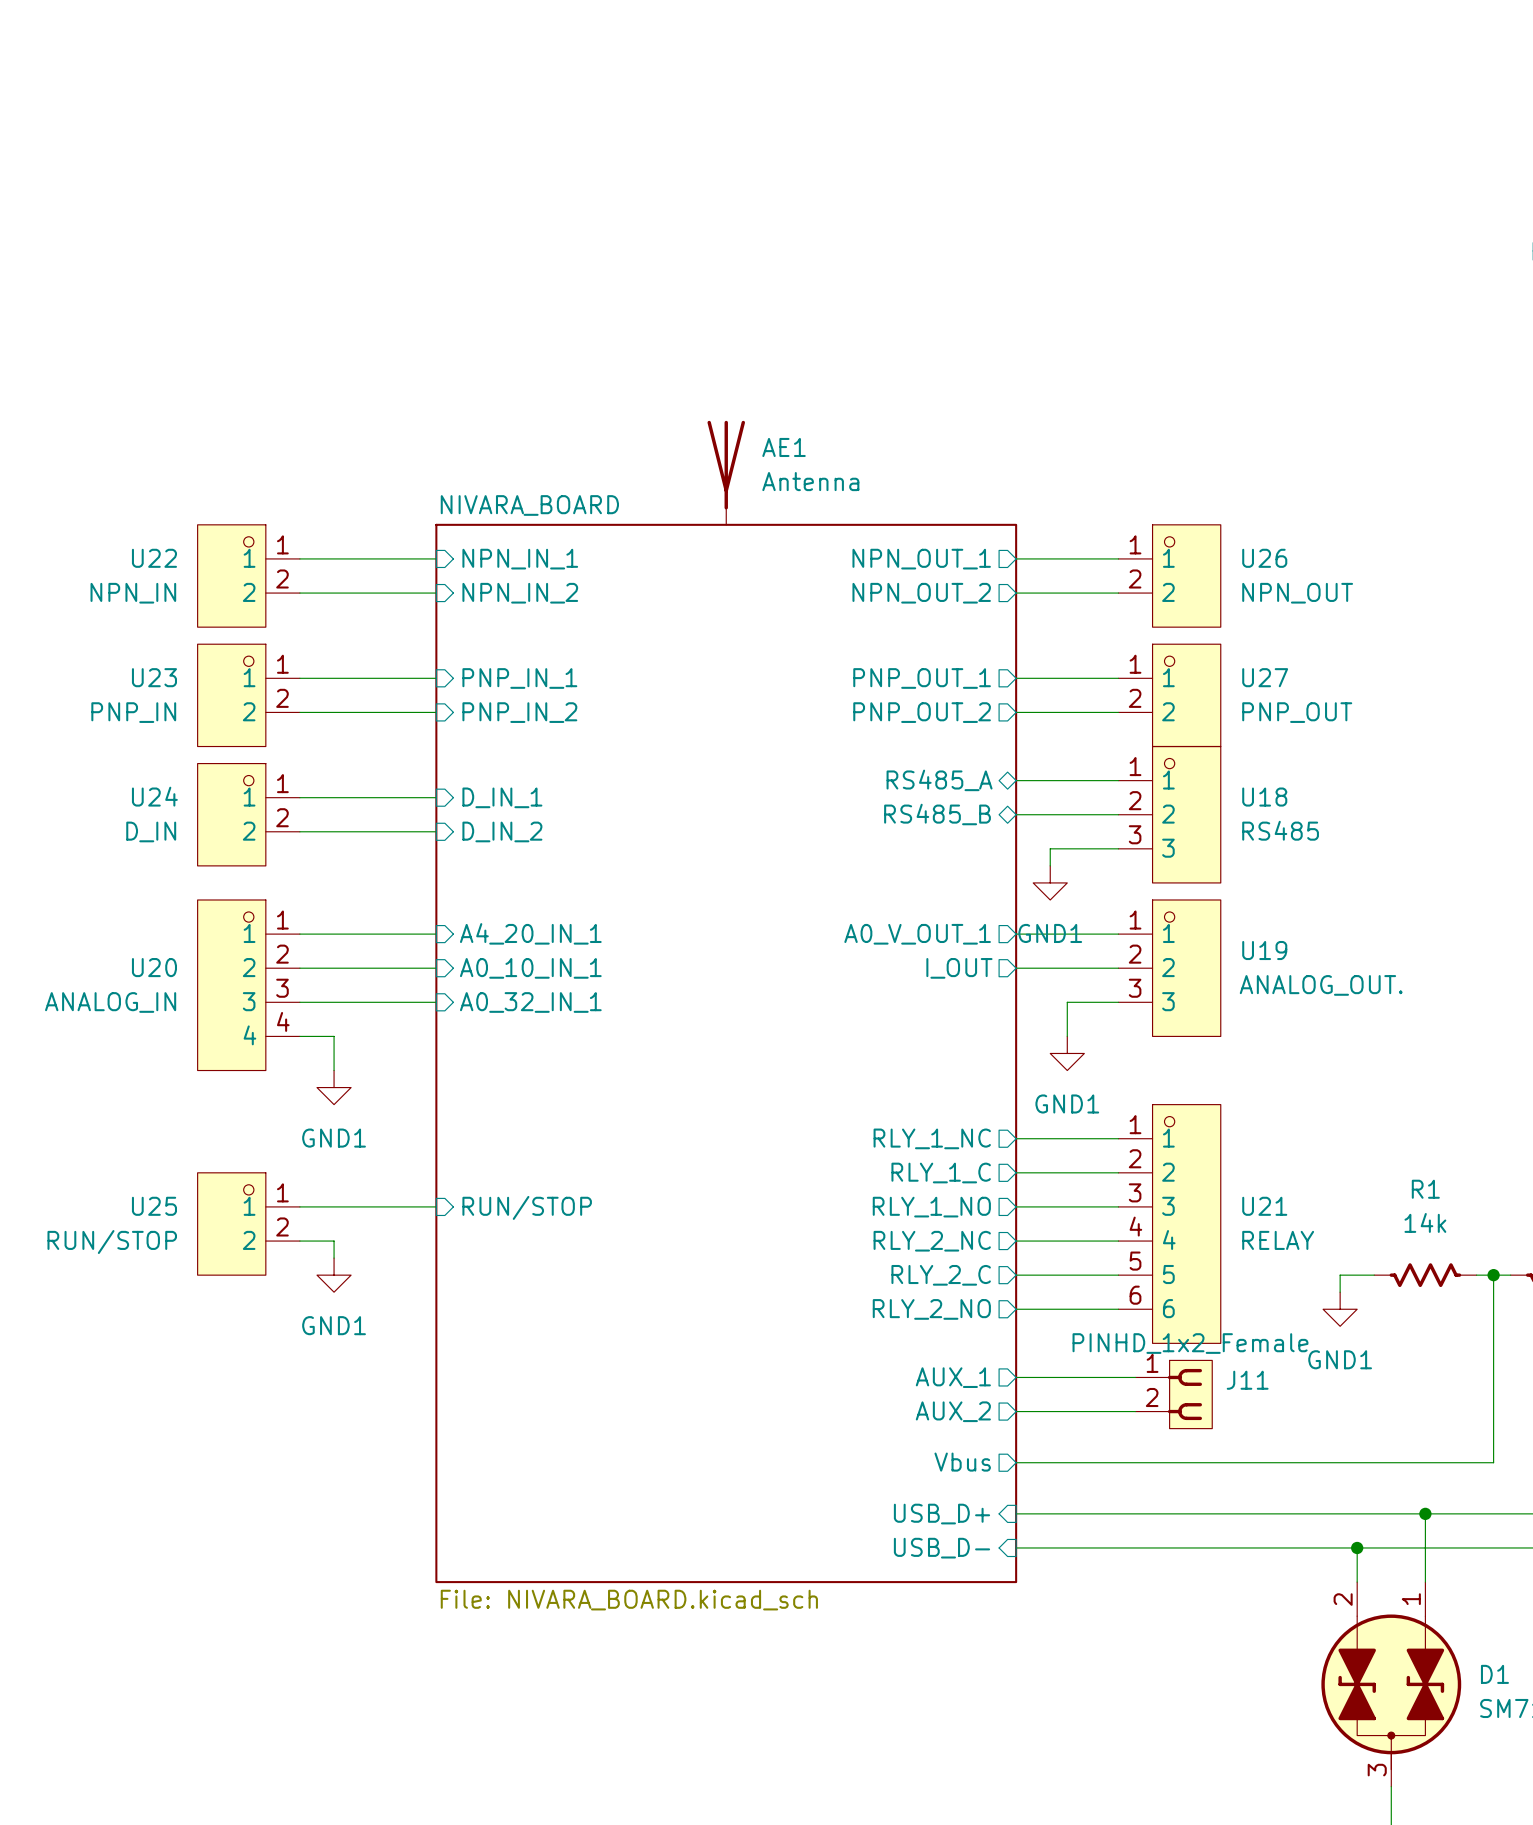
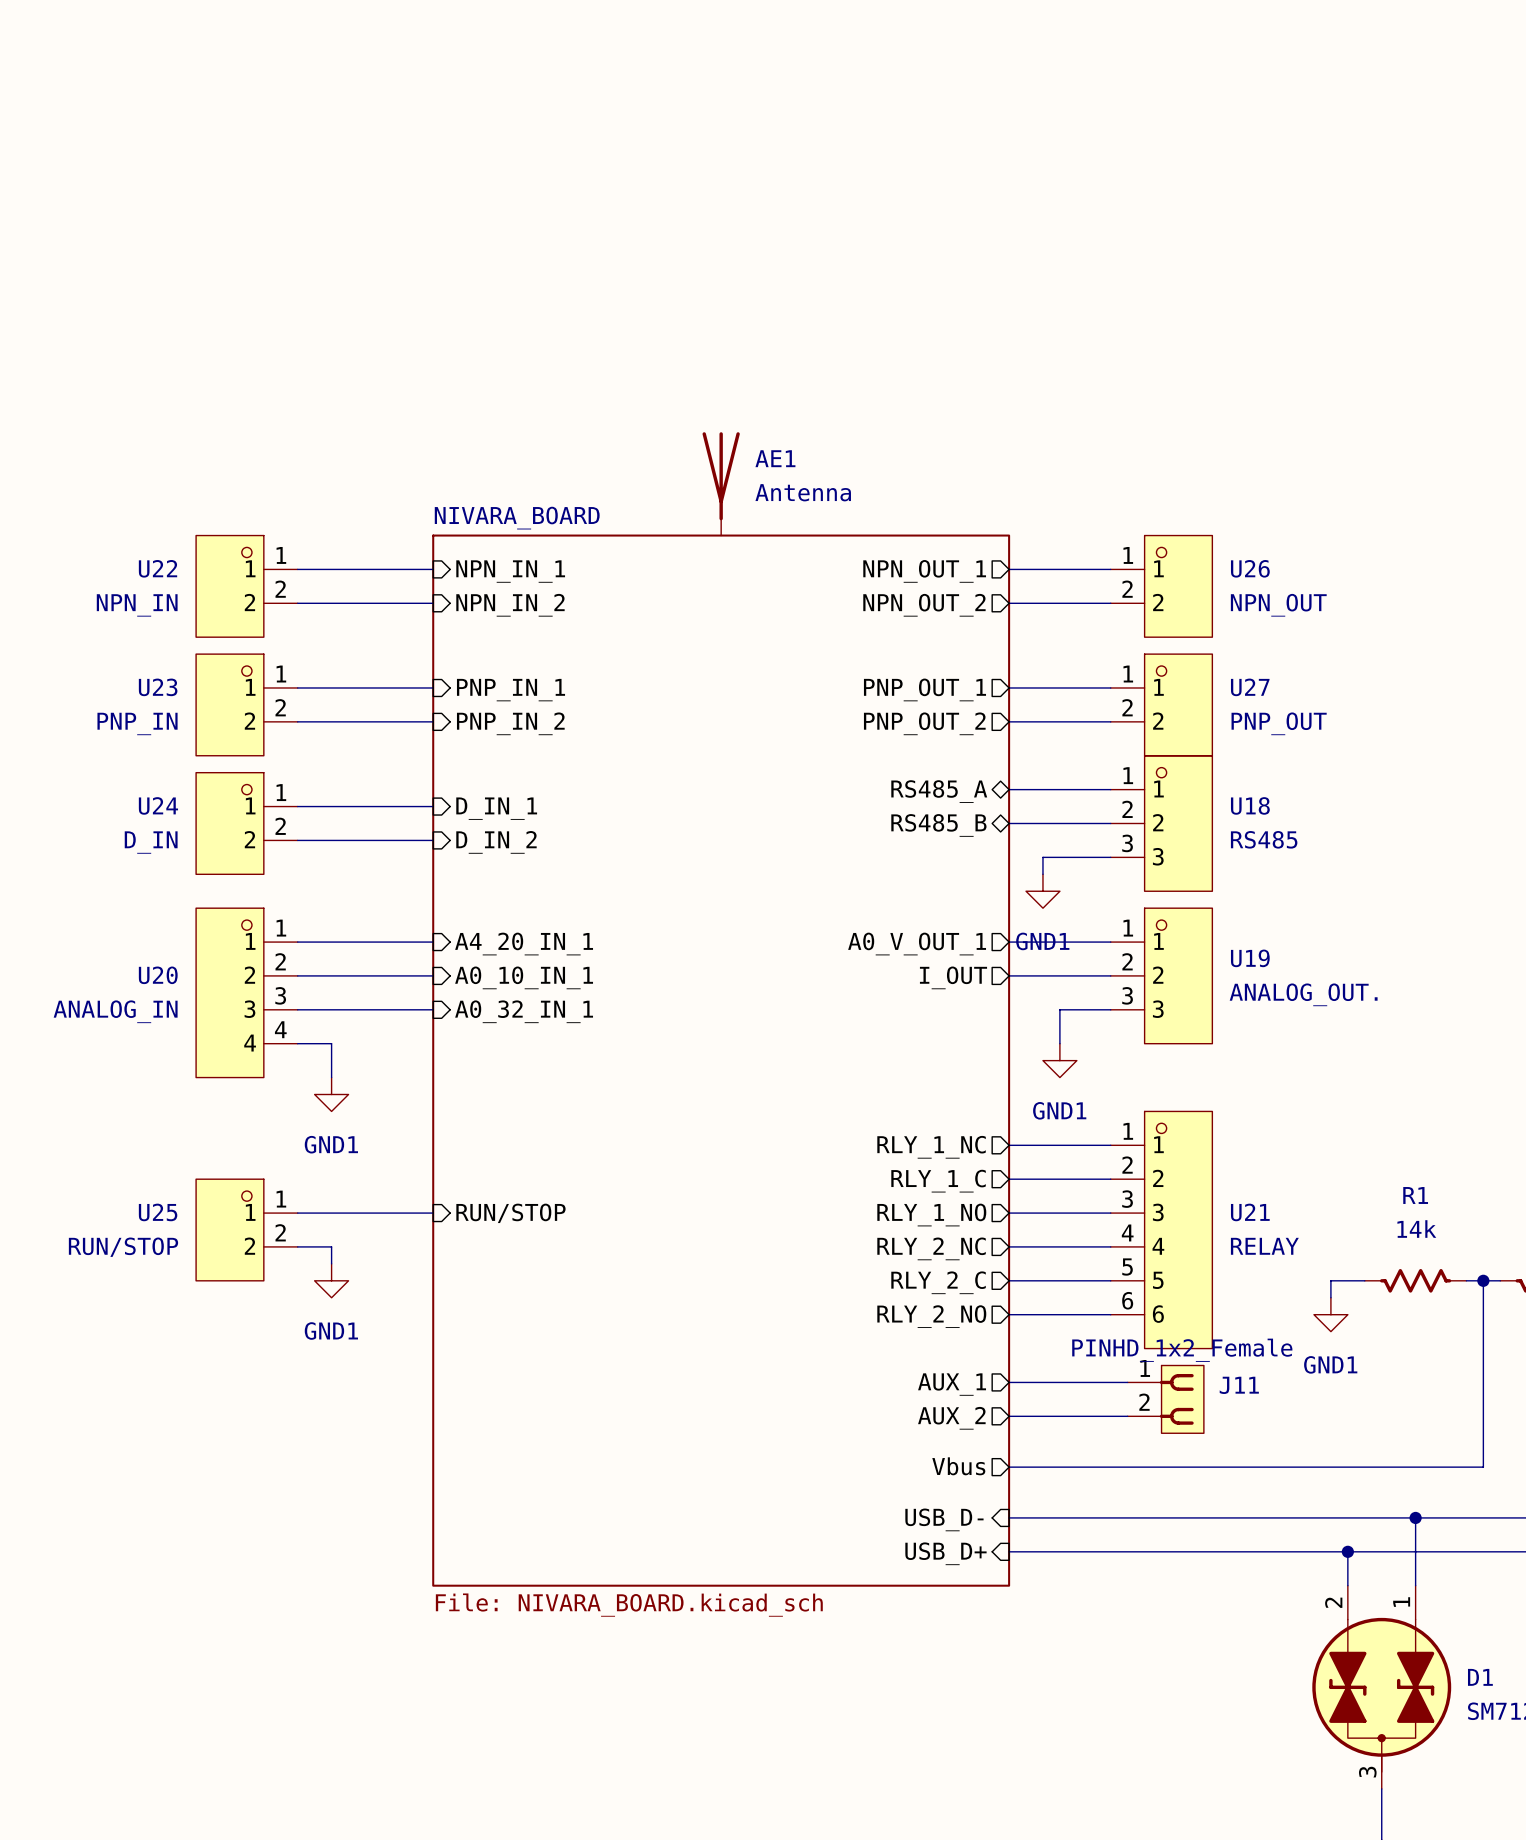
sheet pin: USB_D+ (941, 1514) -> USB_D- (944, 1519)
sheet pin: USB_D- (941, 1548) -> USB_D+ (945, 1553)

